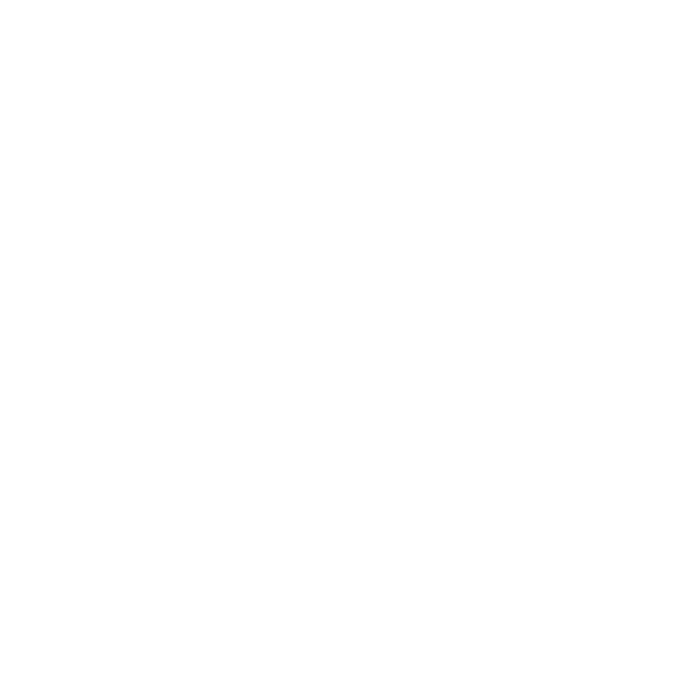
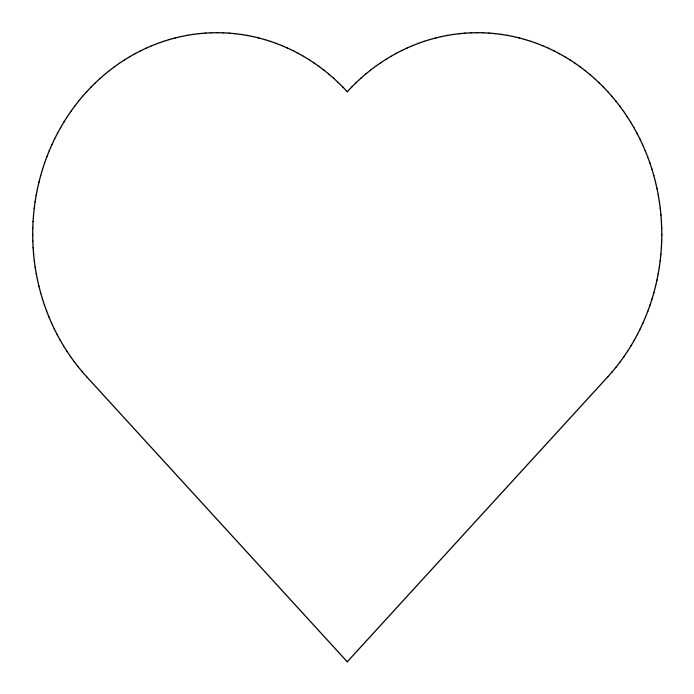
board edge: none -> (477, 32) (441, 36) (407, 47) (375, 66) (347, 91) (328, 74) (308, 59) (287, 47) (258, 37) (229, 33) (205, 33) (181, 36) (157, 43) (135, 53) (114, 66) (95, 82) (78, 101) (63, 121) (51, 144) (37, 188) (32, 228) (36, 273) (49, 317) (66, 351) (86, 376) (347, 661) (616, 366) (640, 328) (650, 305) (656, 280) (661, 234) (657, 188) (645, 150) (623, 111) (594, 78) (559, 53) (519, 37) (477, 32)

